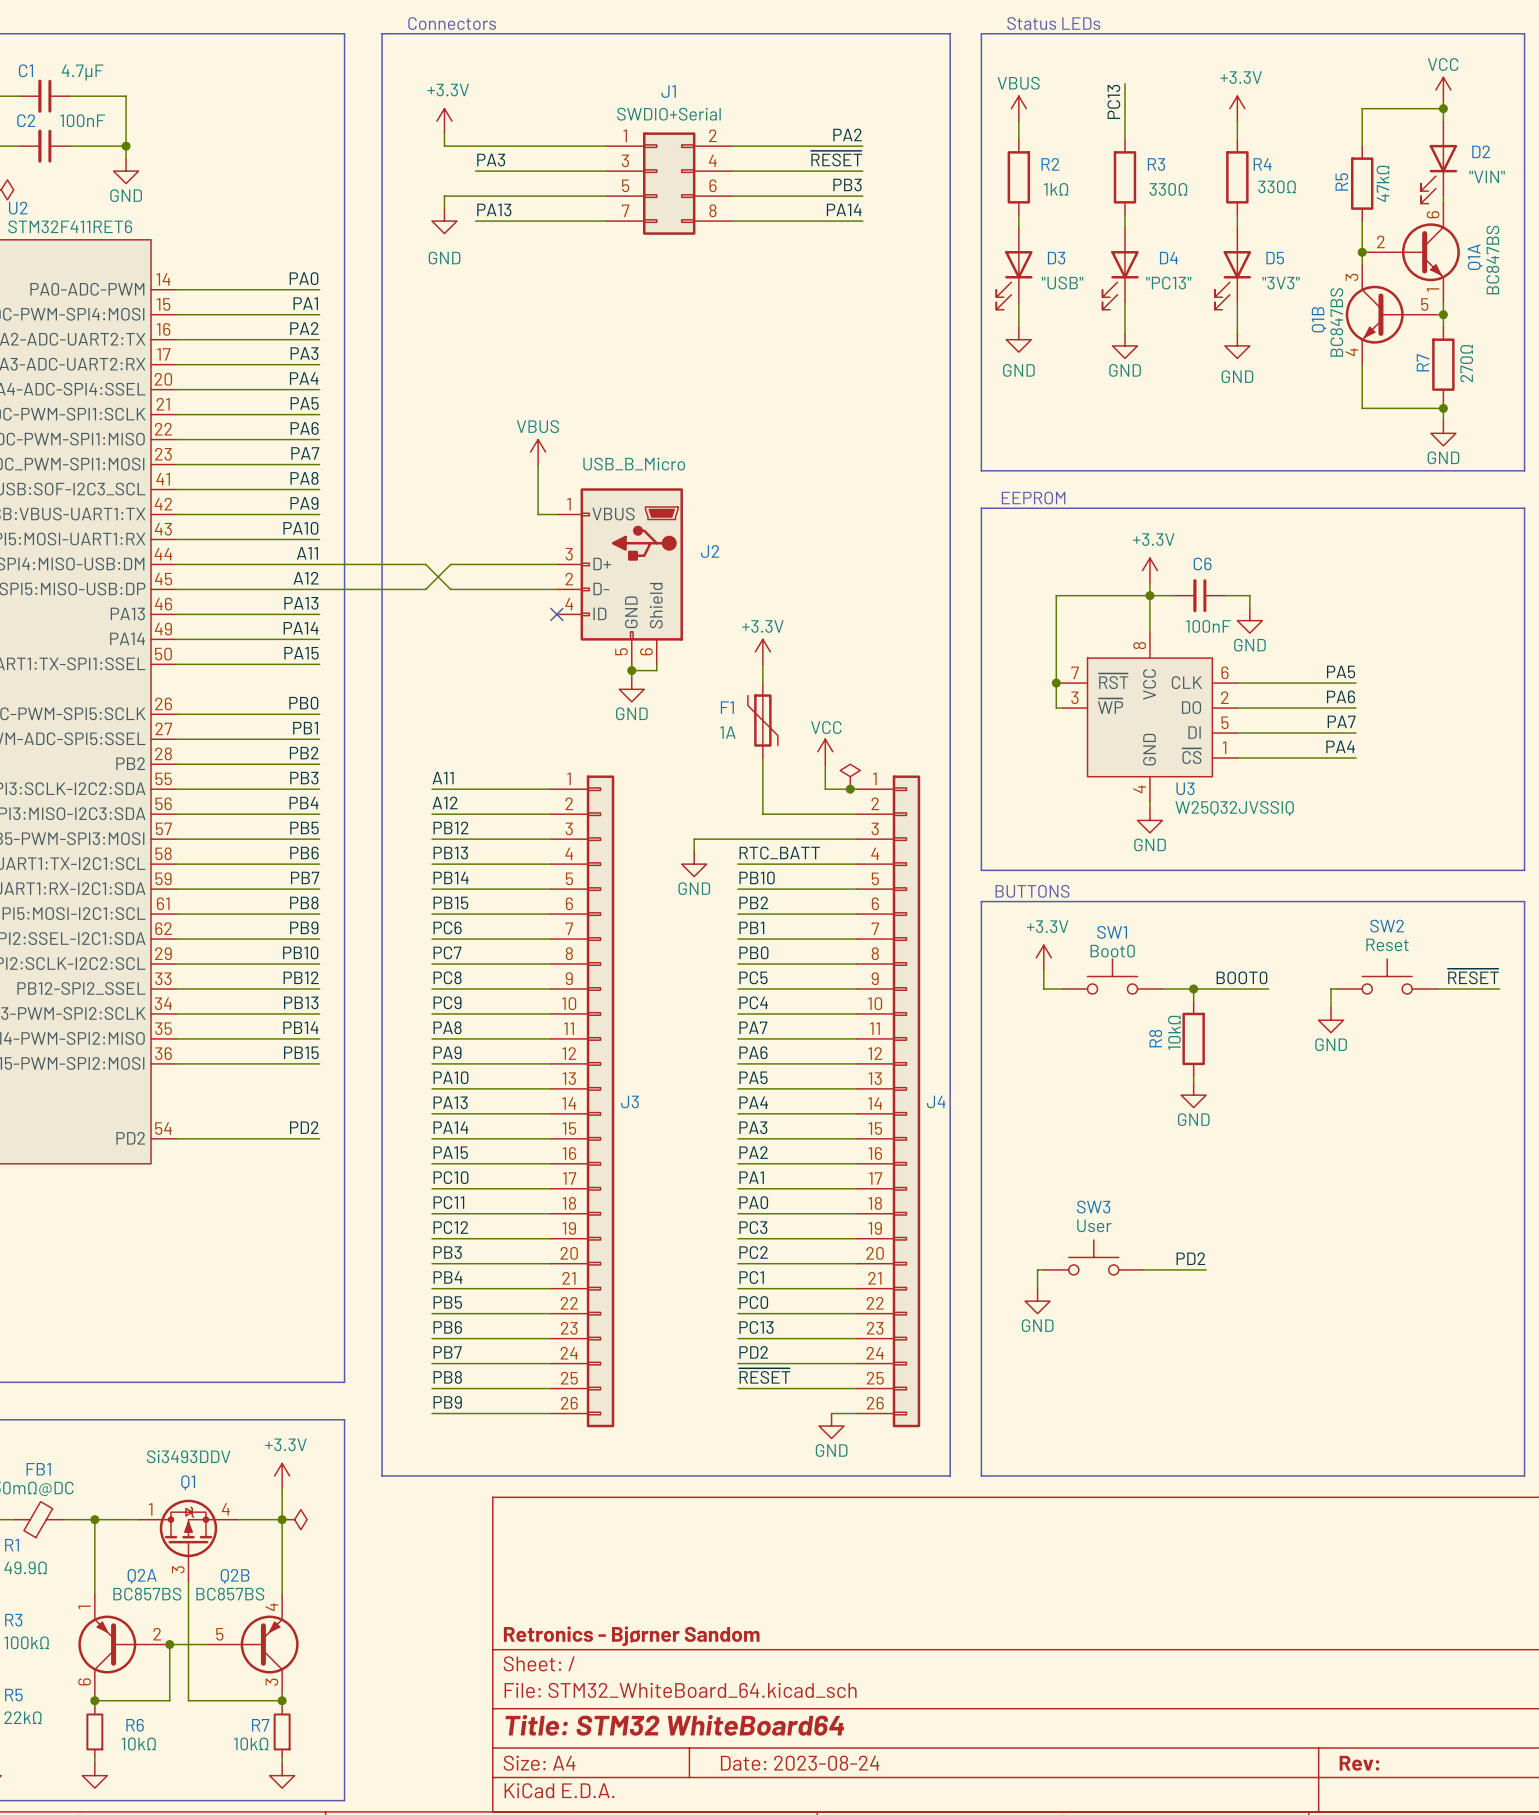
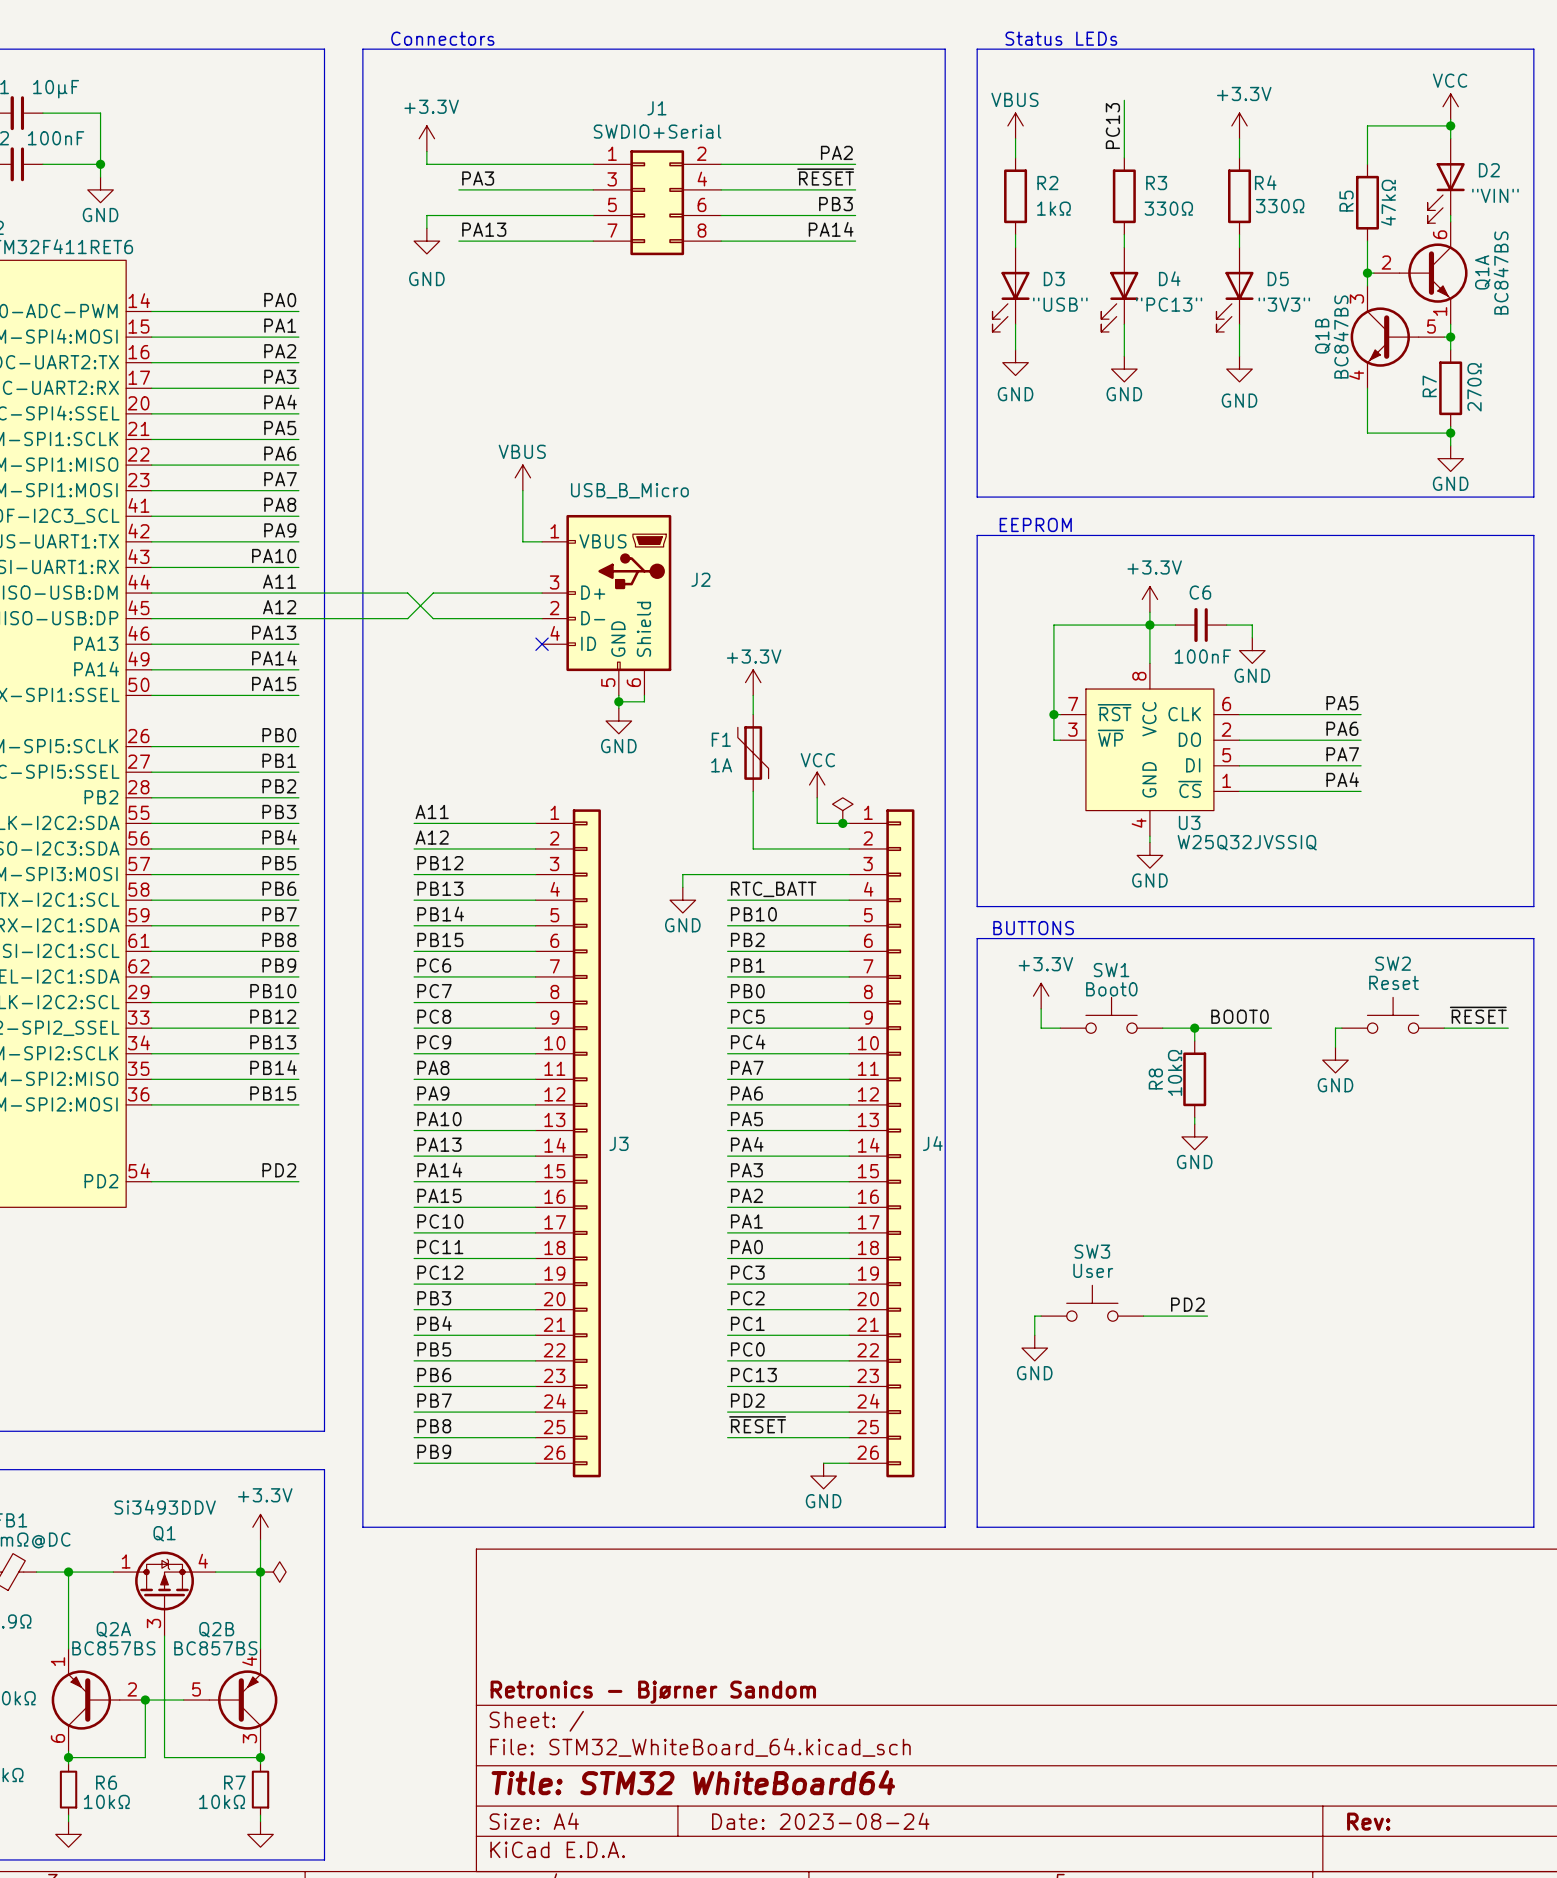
C1 value: 4.7µF (82, 72) -> 10µF (56, 89)

